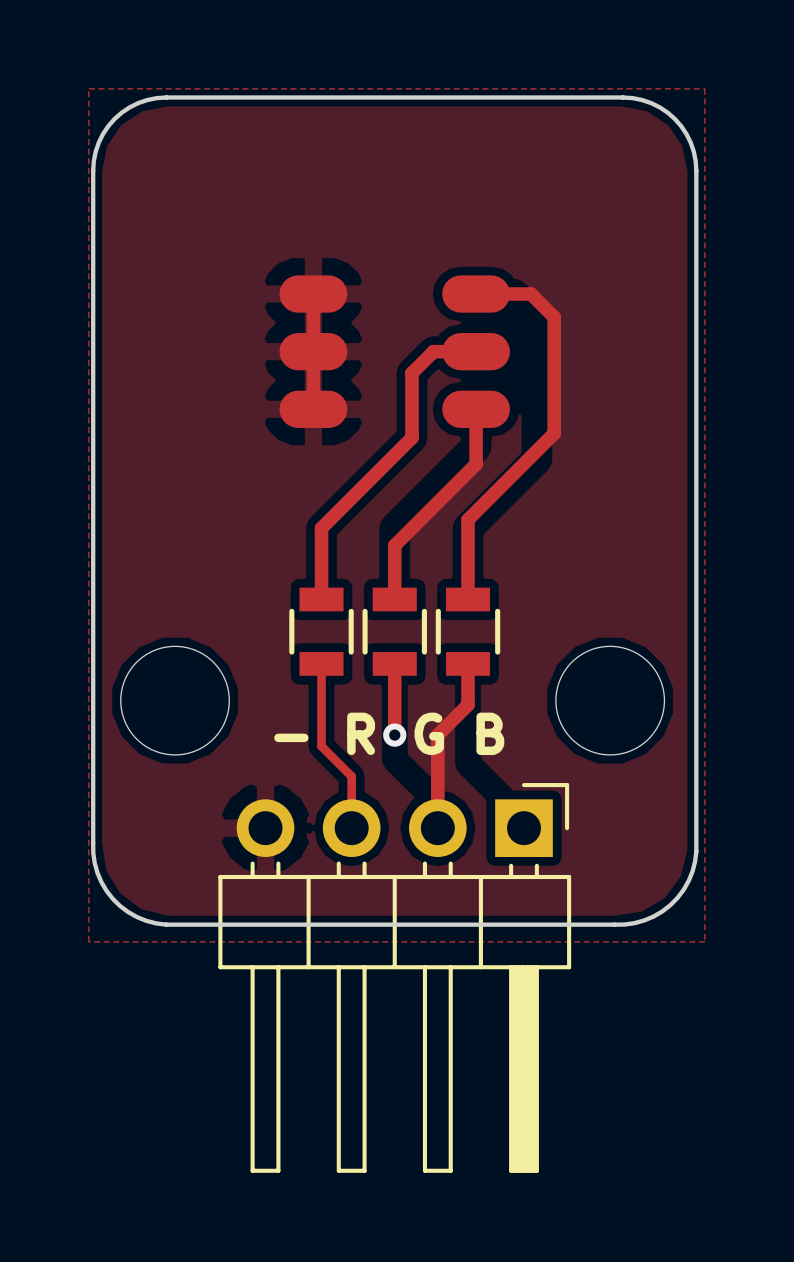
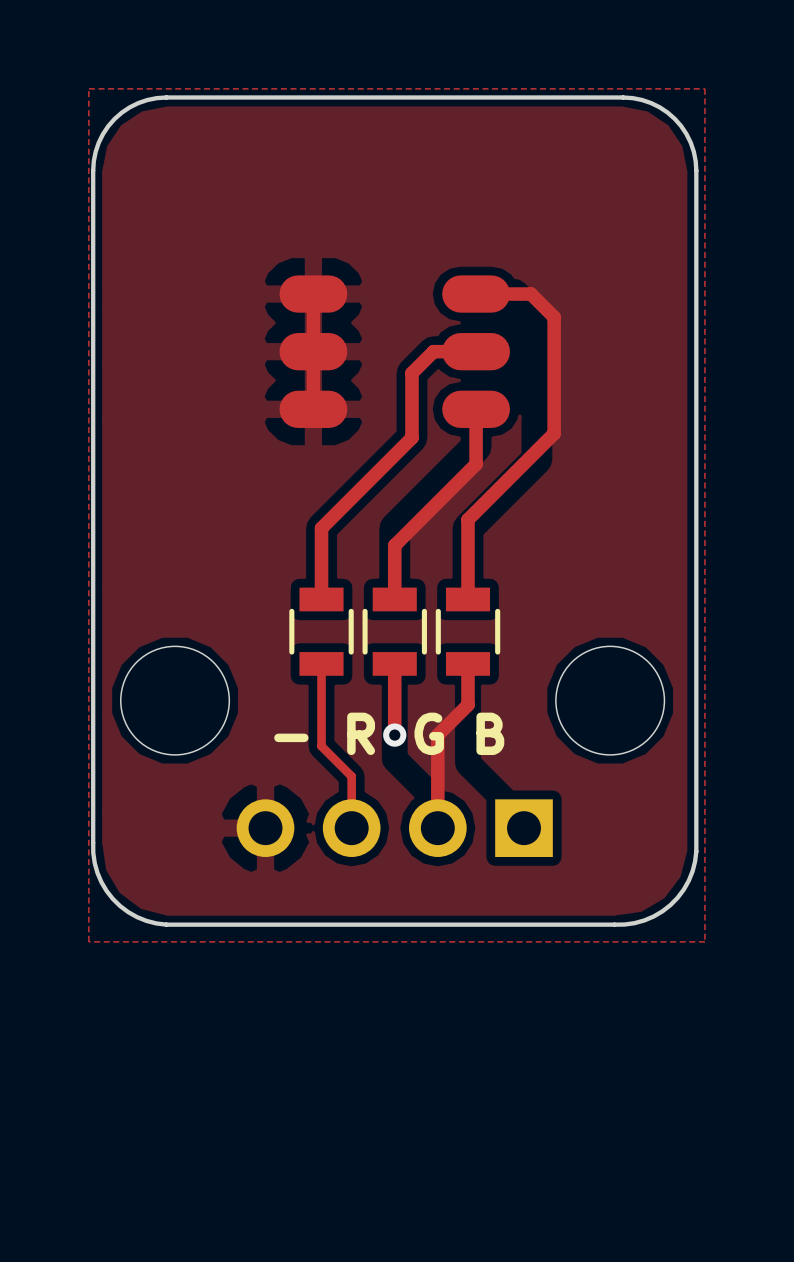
part: (394, 977) -> none

